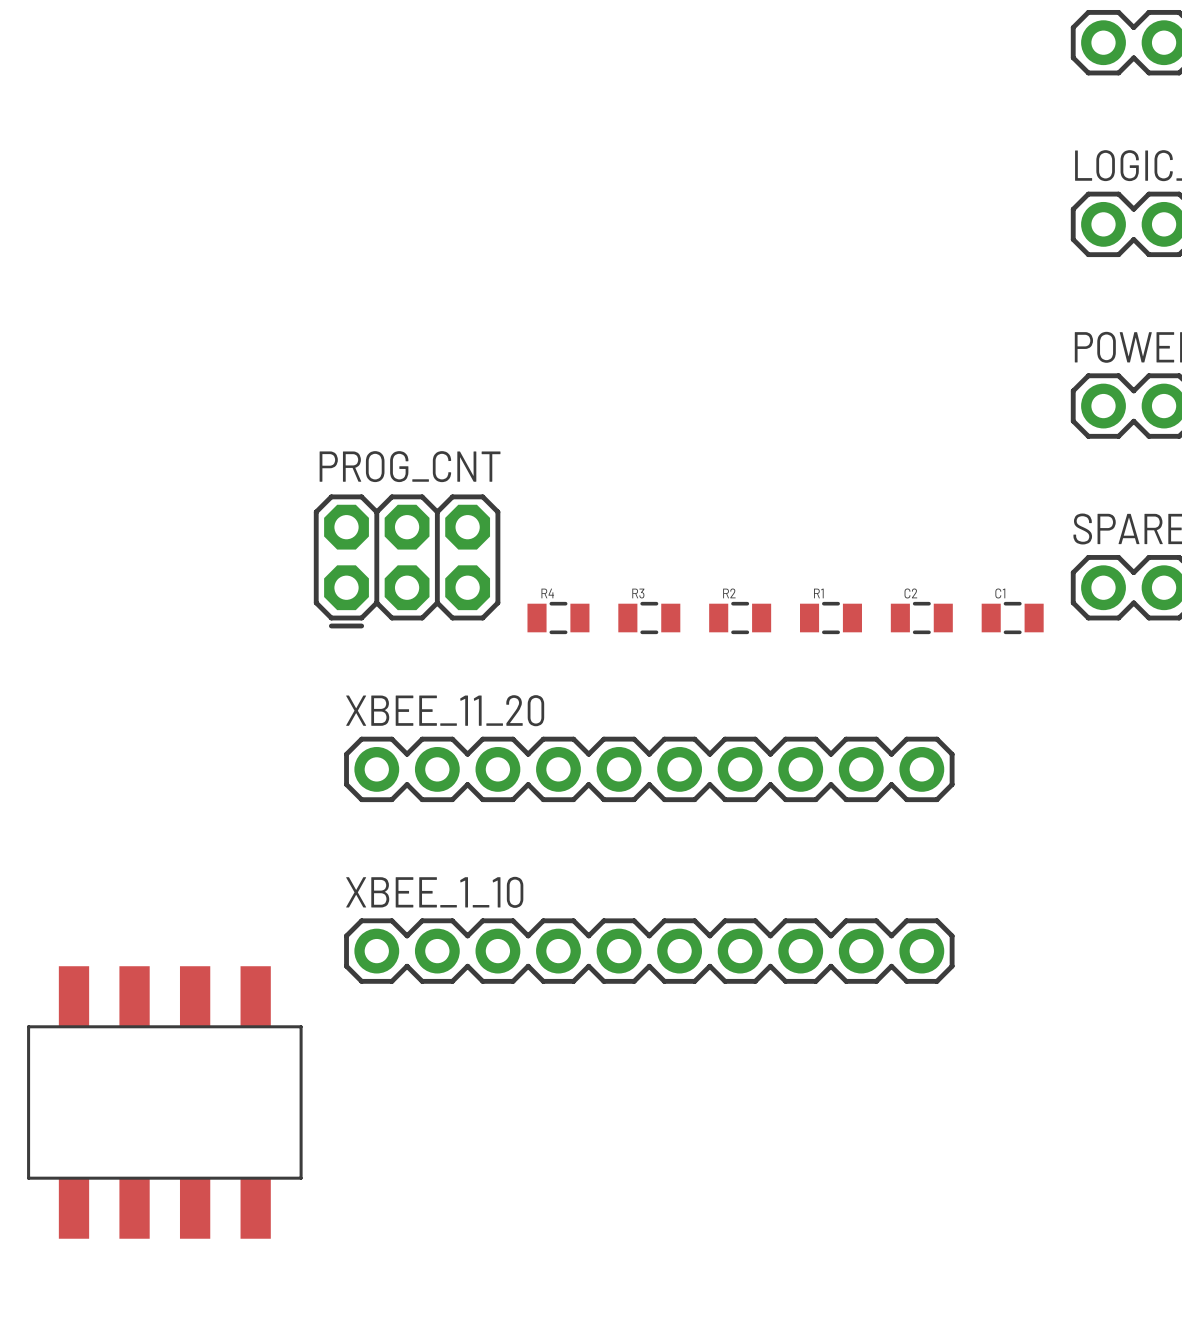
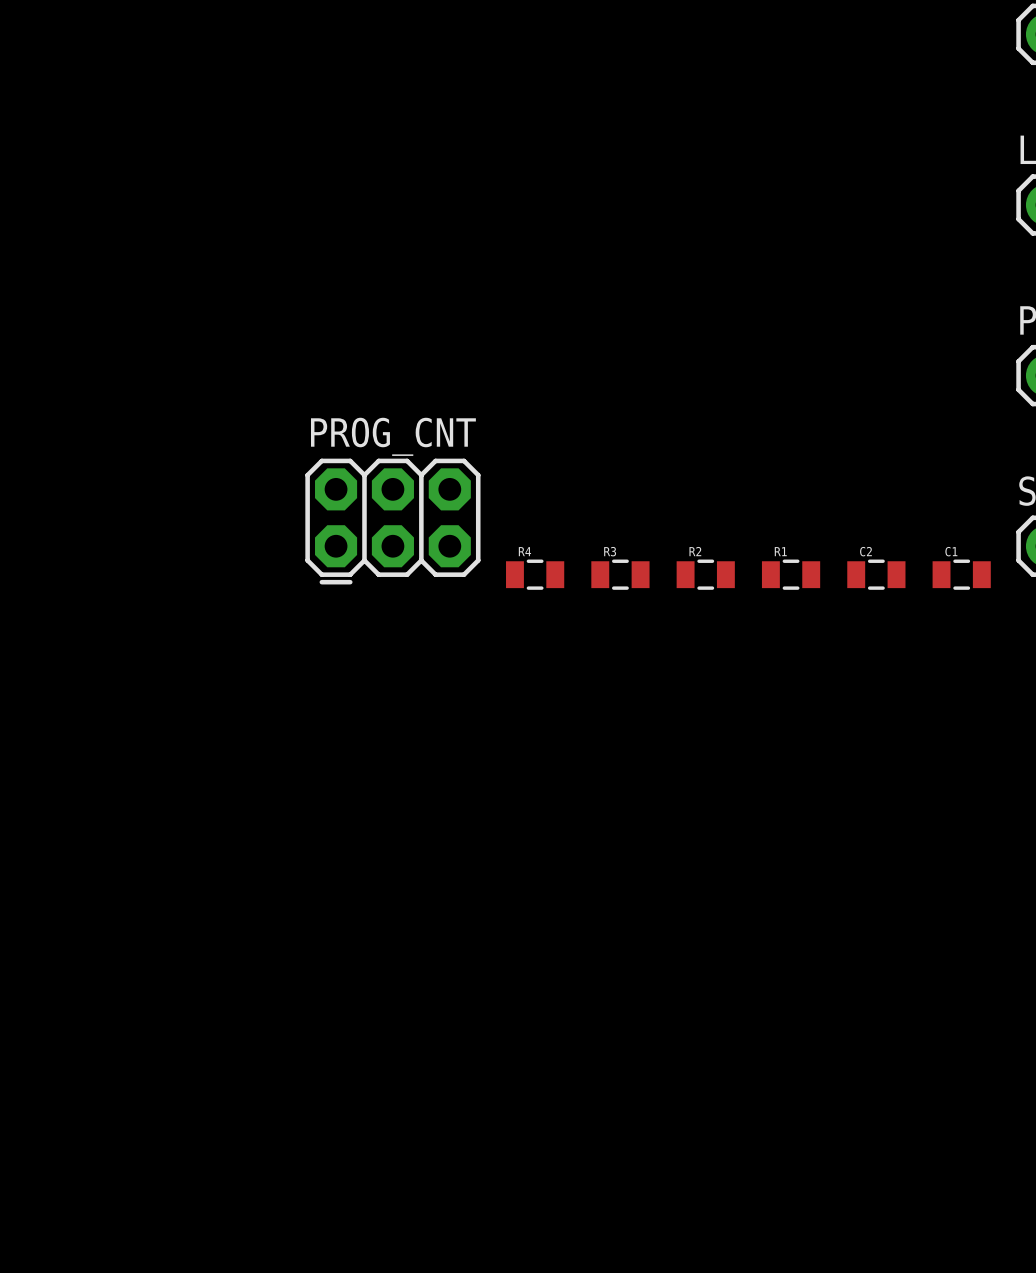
XBEE_11_20: (649, 769) -> none
XBEE_1_10: (649, 951) -> none
part: (164, 1102) -> none

